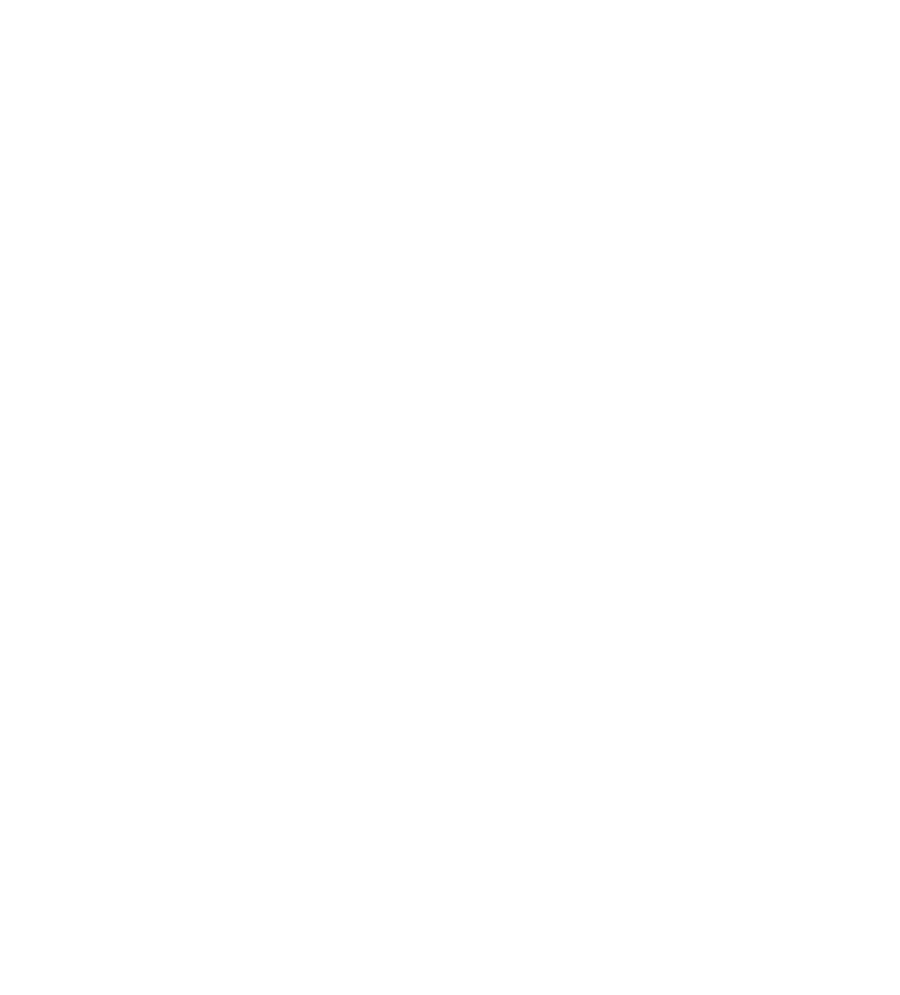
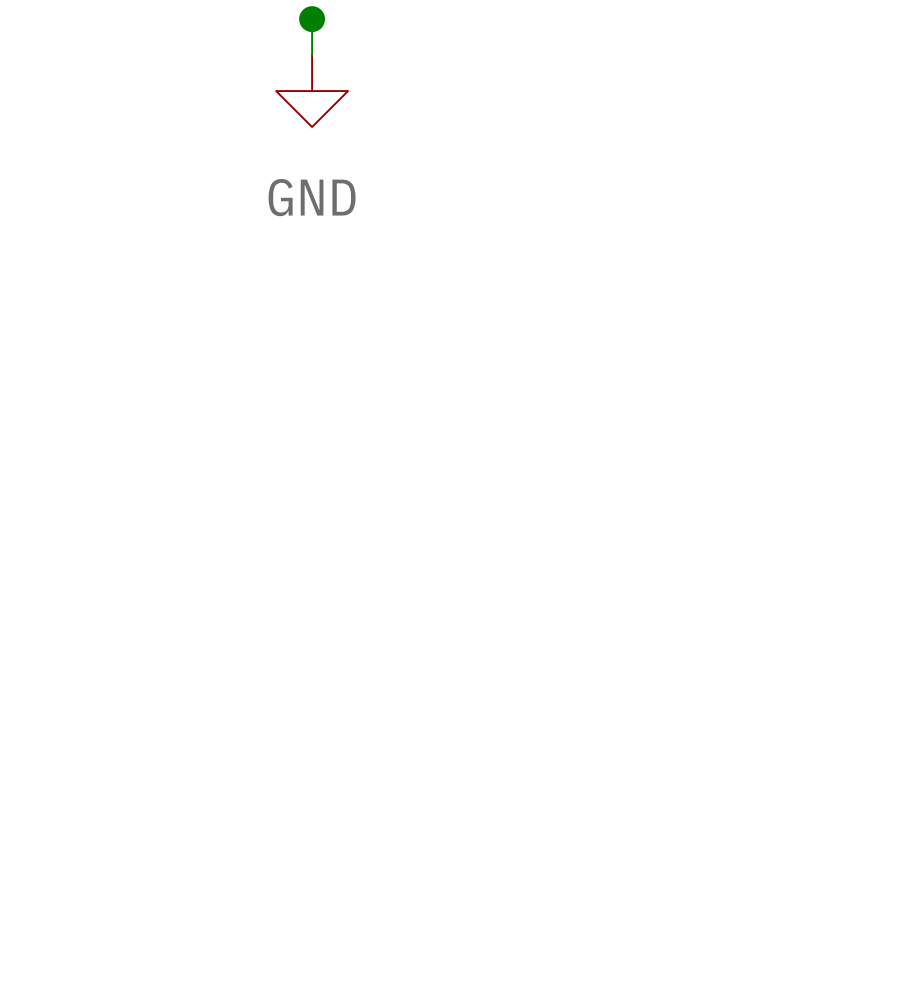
wire: none -> (312, 19) (312, 55)
junction: none -> (312, 19)
power symbol: none -> GND (312, 91)

